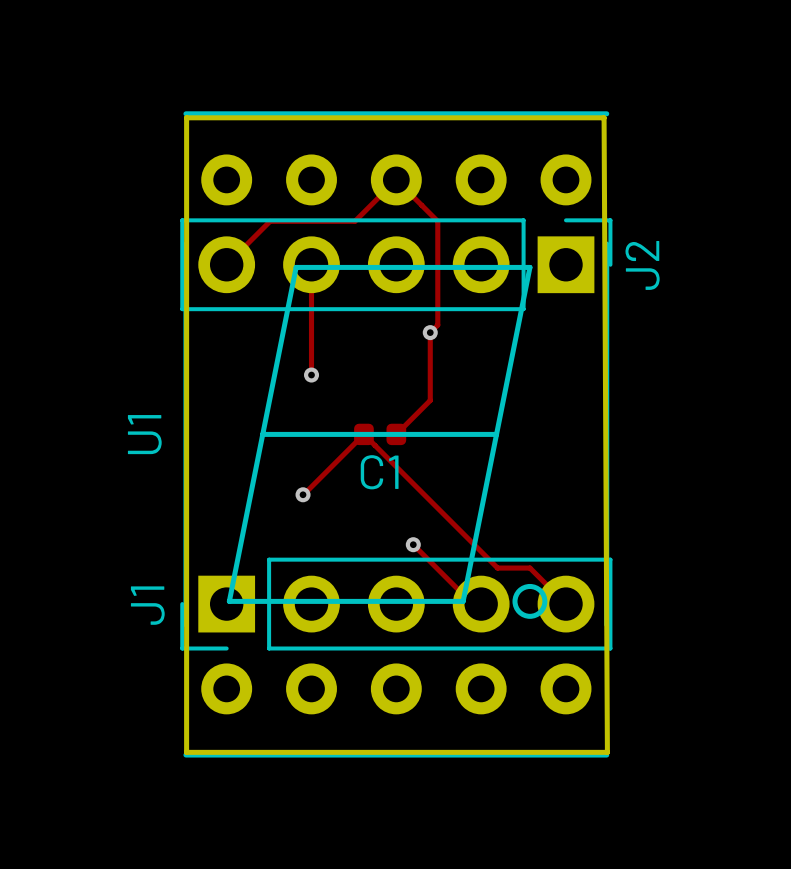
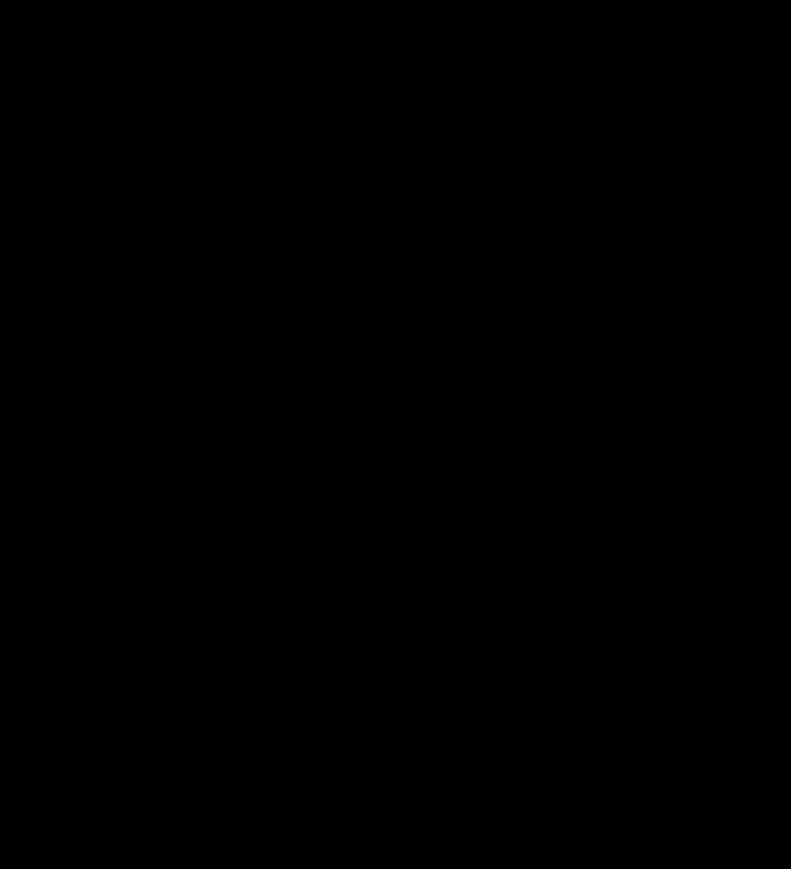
board edge: (186, 117) (186, 752) (607, 752) (604, 117) (186, 117) -> none
track: (226, 264) (270, 221) (354, 221) (396, 179) (437, 221) (437, 325) (430, 332) (430, 400) (396, 434) -> none
track: (311, 264) (311, 375) -> none
J2: (396, 264) -> none
via: (430, 332) -> none
via: (311, 375) -> none
C1: (380, 434) -> none
U1: (396, 434) -> none
track: (303, 494) (363, 434) (497, 568) (529, 568) (566, 604) -> none
via: (303, 494) -> none
track: (413, 544) (472, 604) (481, 604) -> none
via: (413, 544) -> none
J1: (396, 604) -> none

